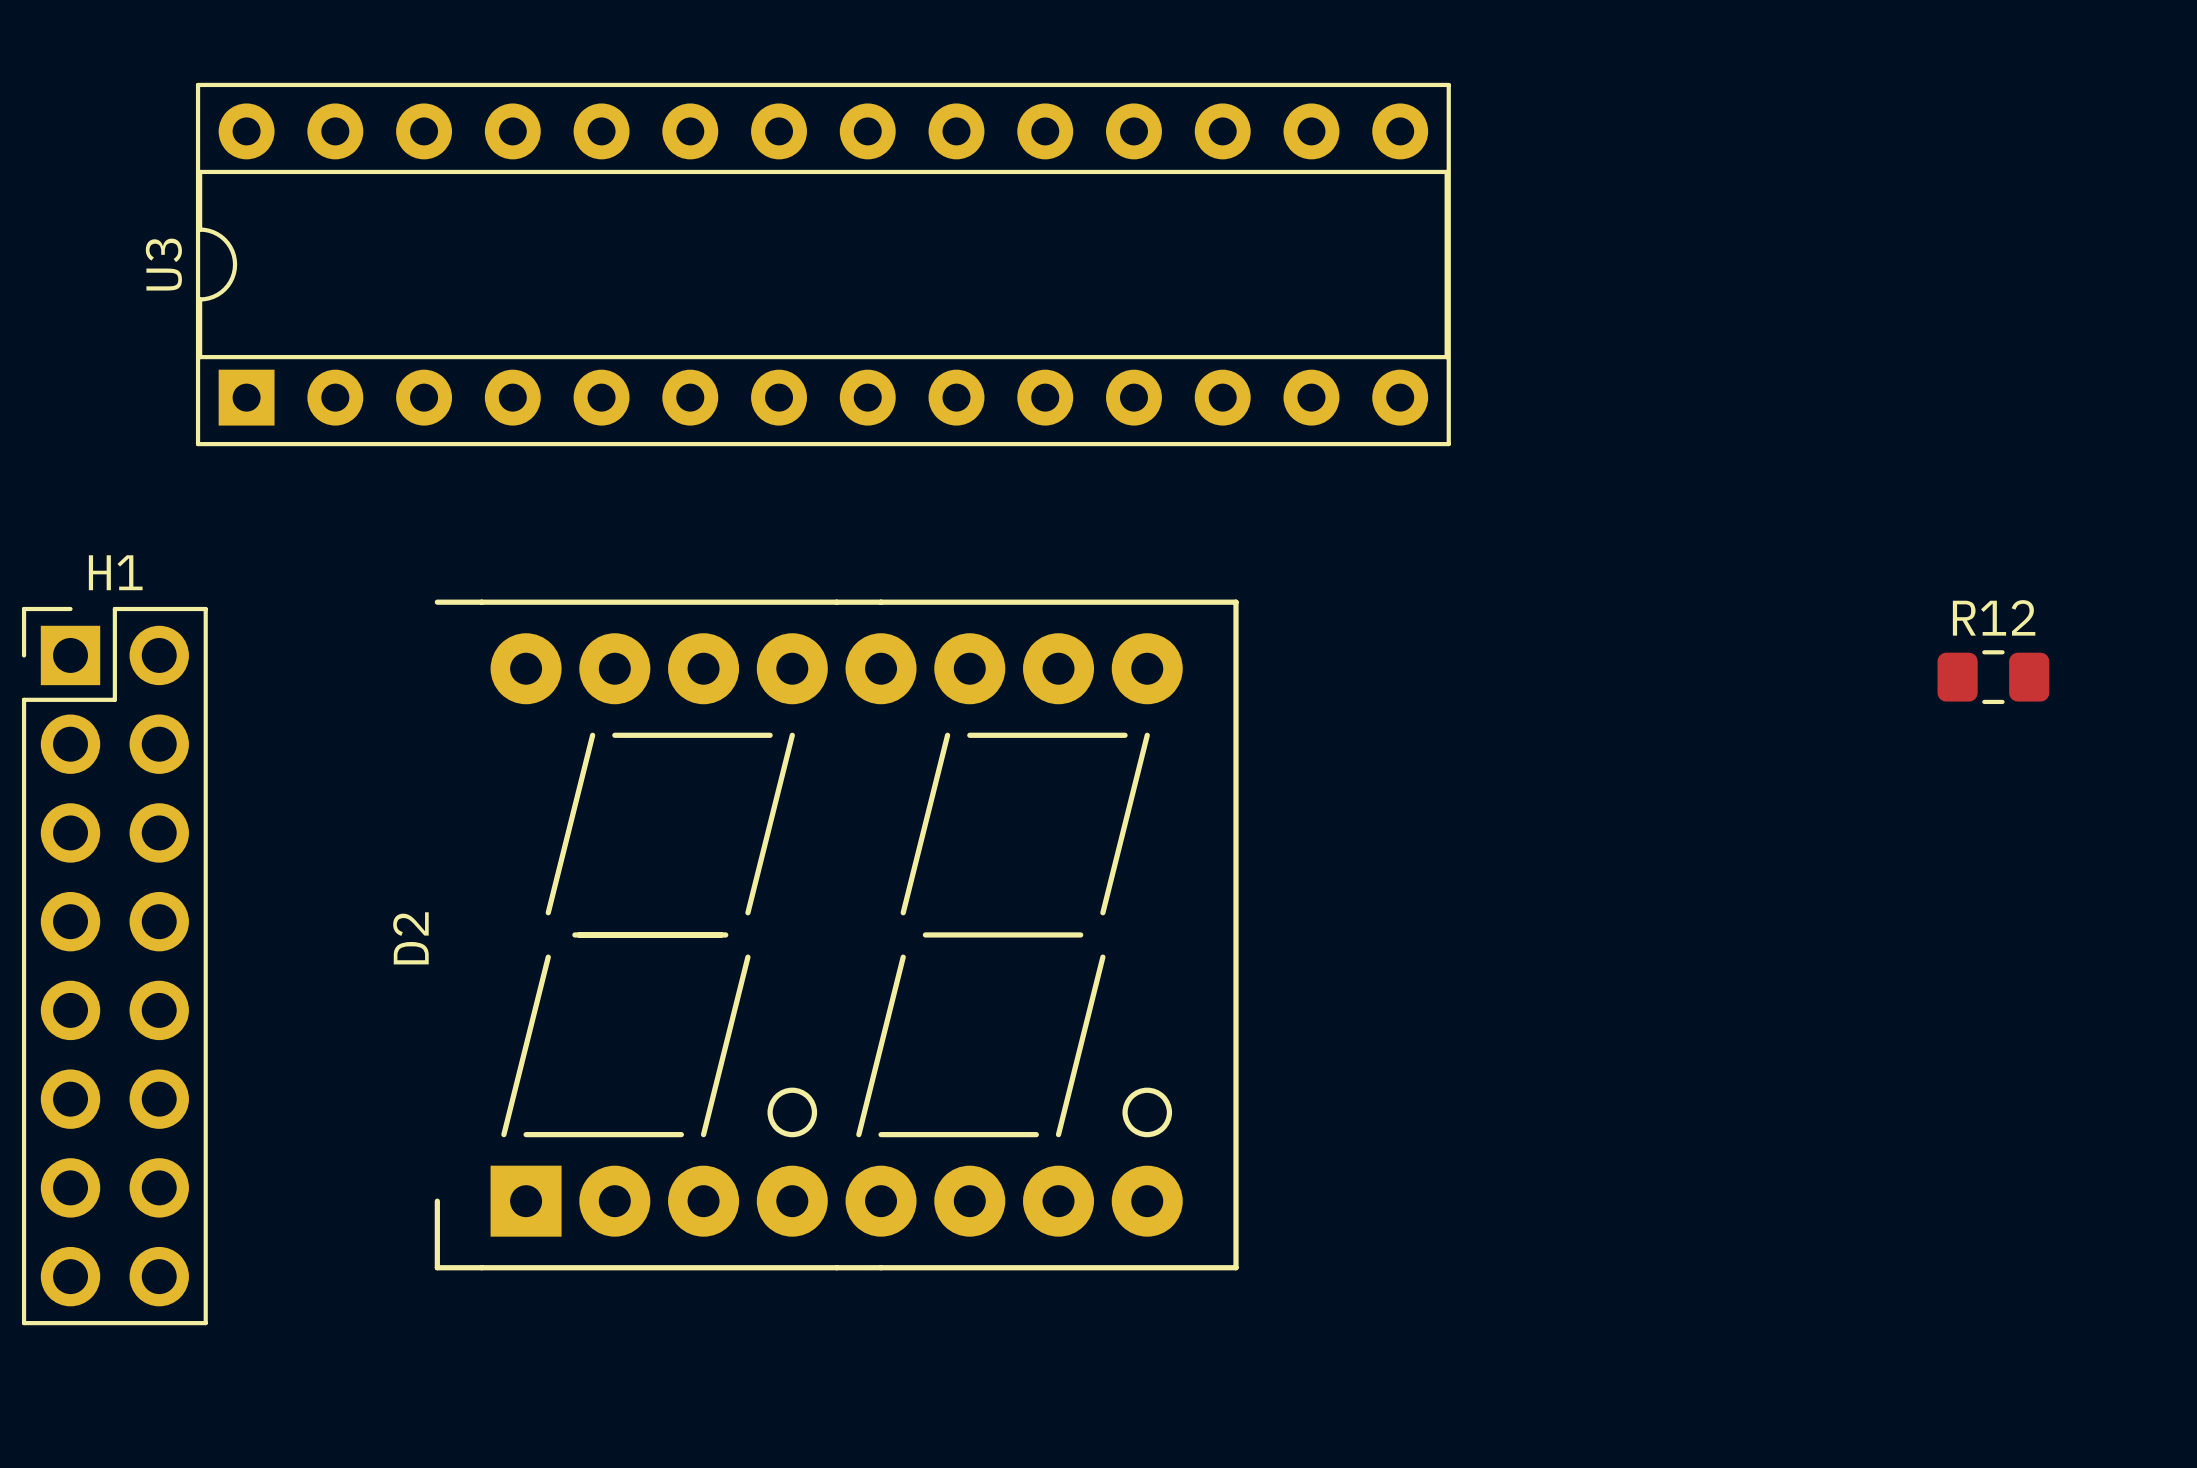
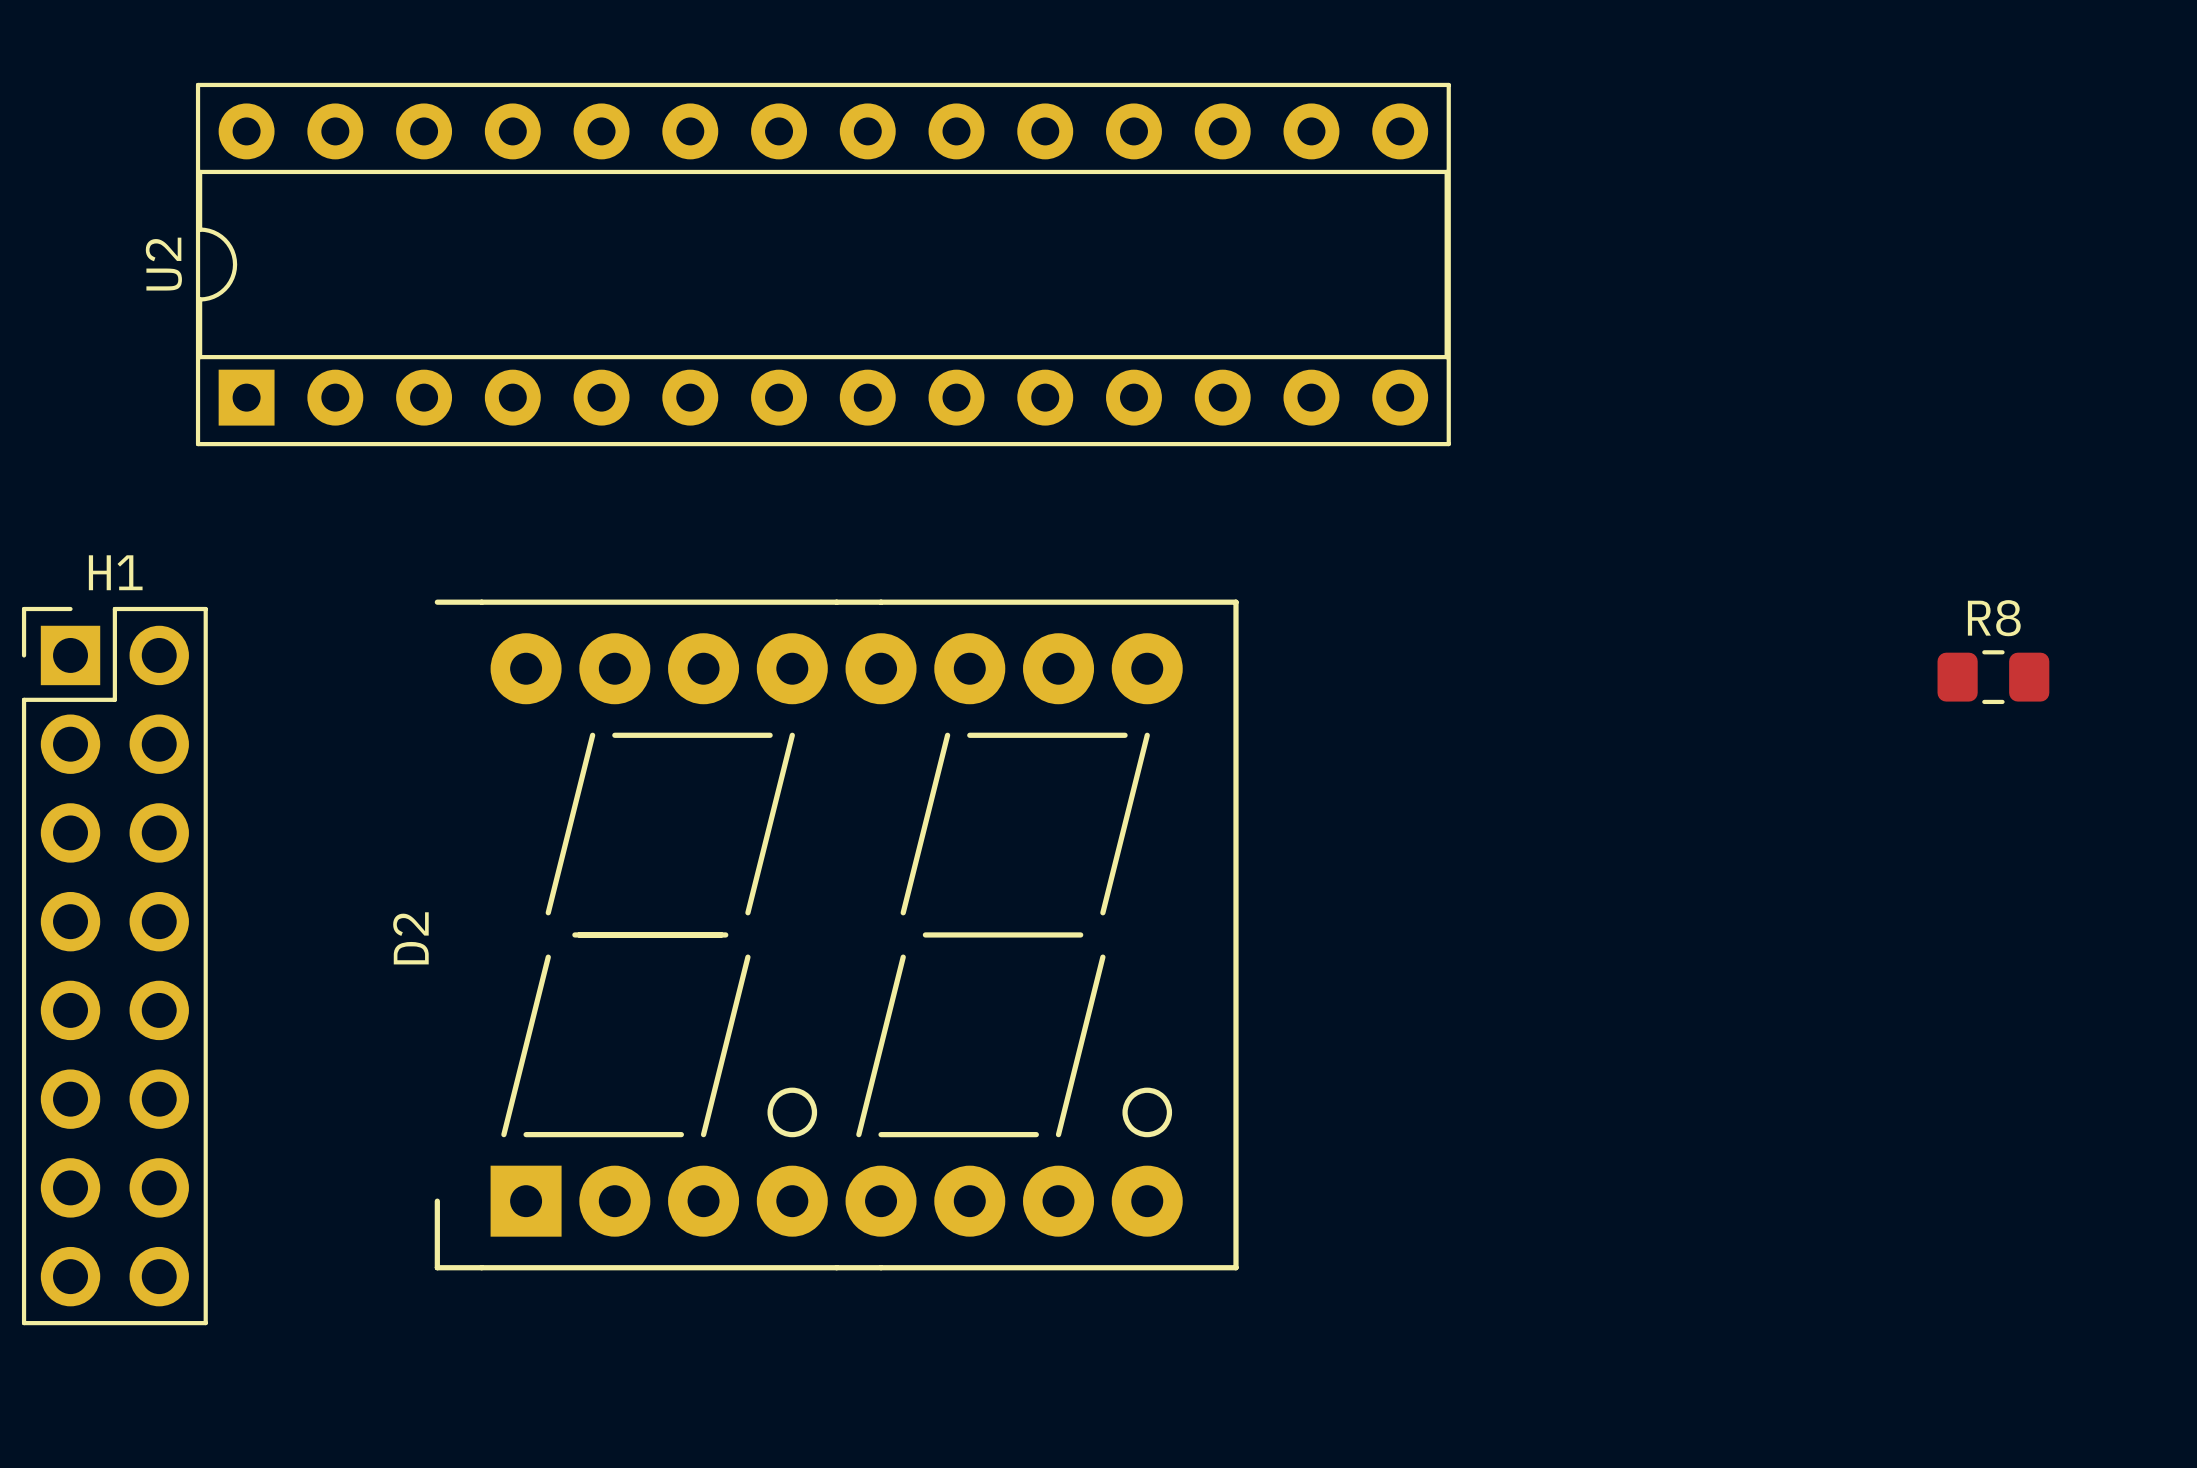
U3 name: U3 (163, 264) -> U2 (163, 264)
R12 name: R12 (1994, 617) -> R8 (1994, 618)

